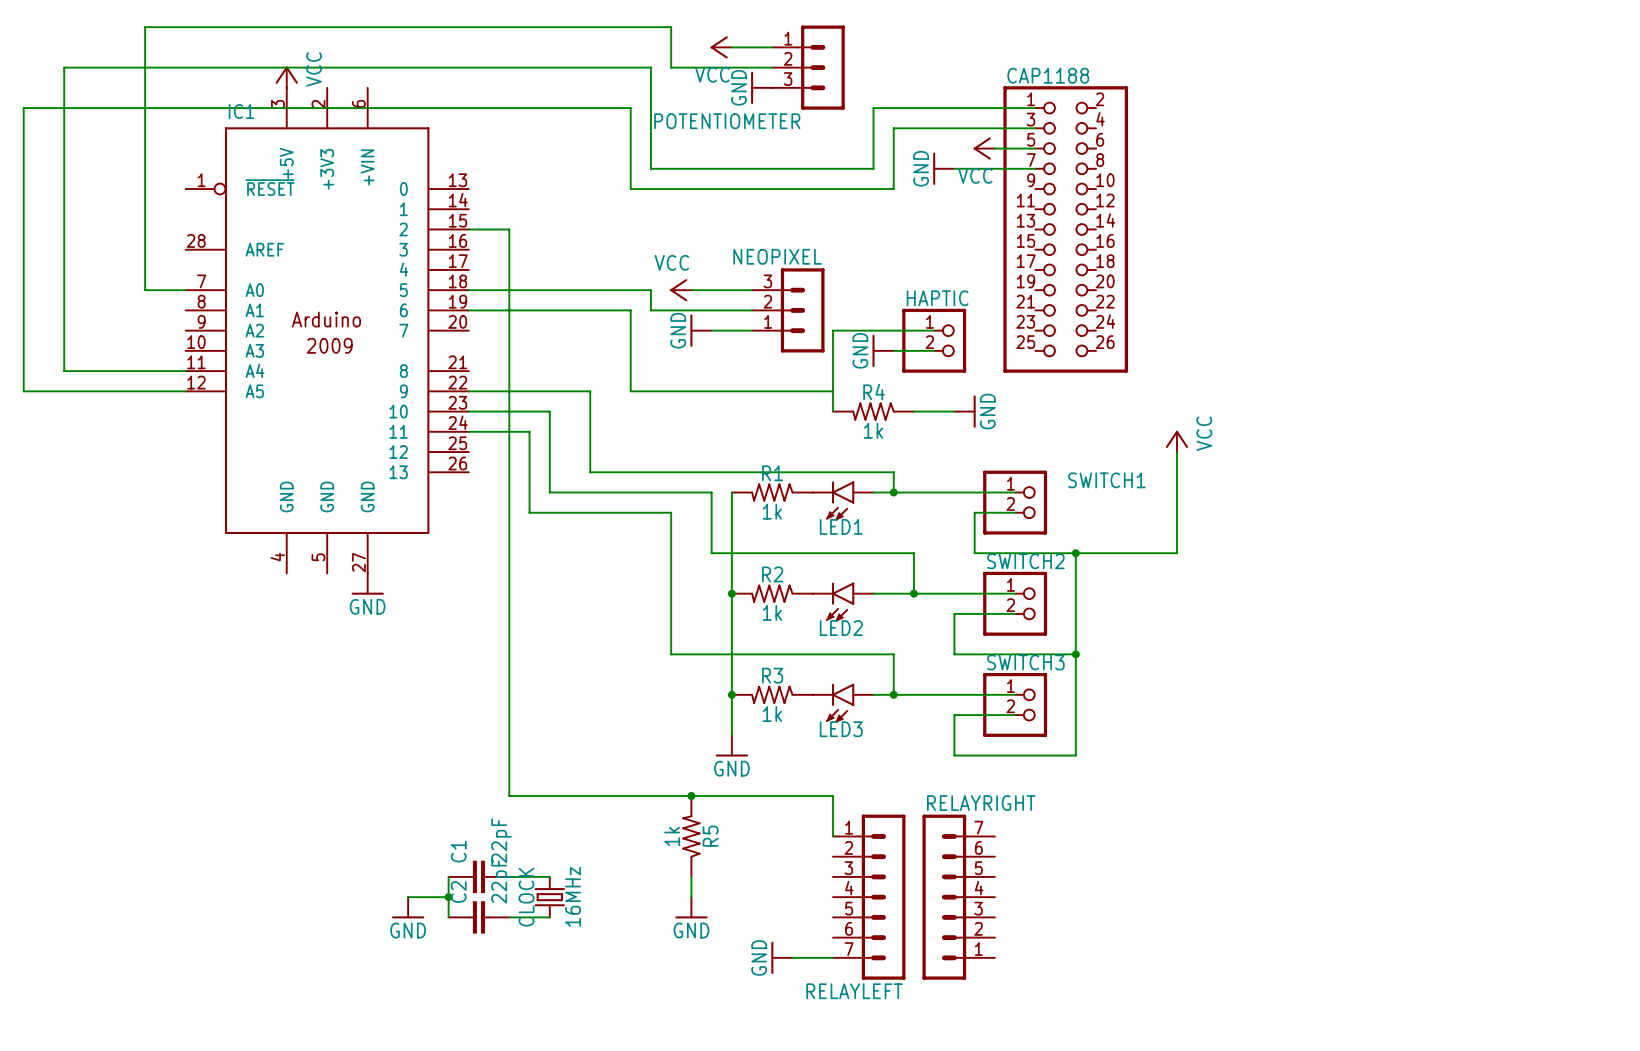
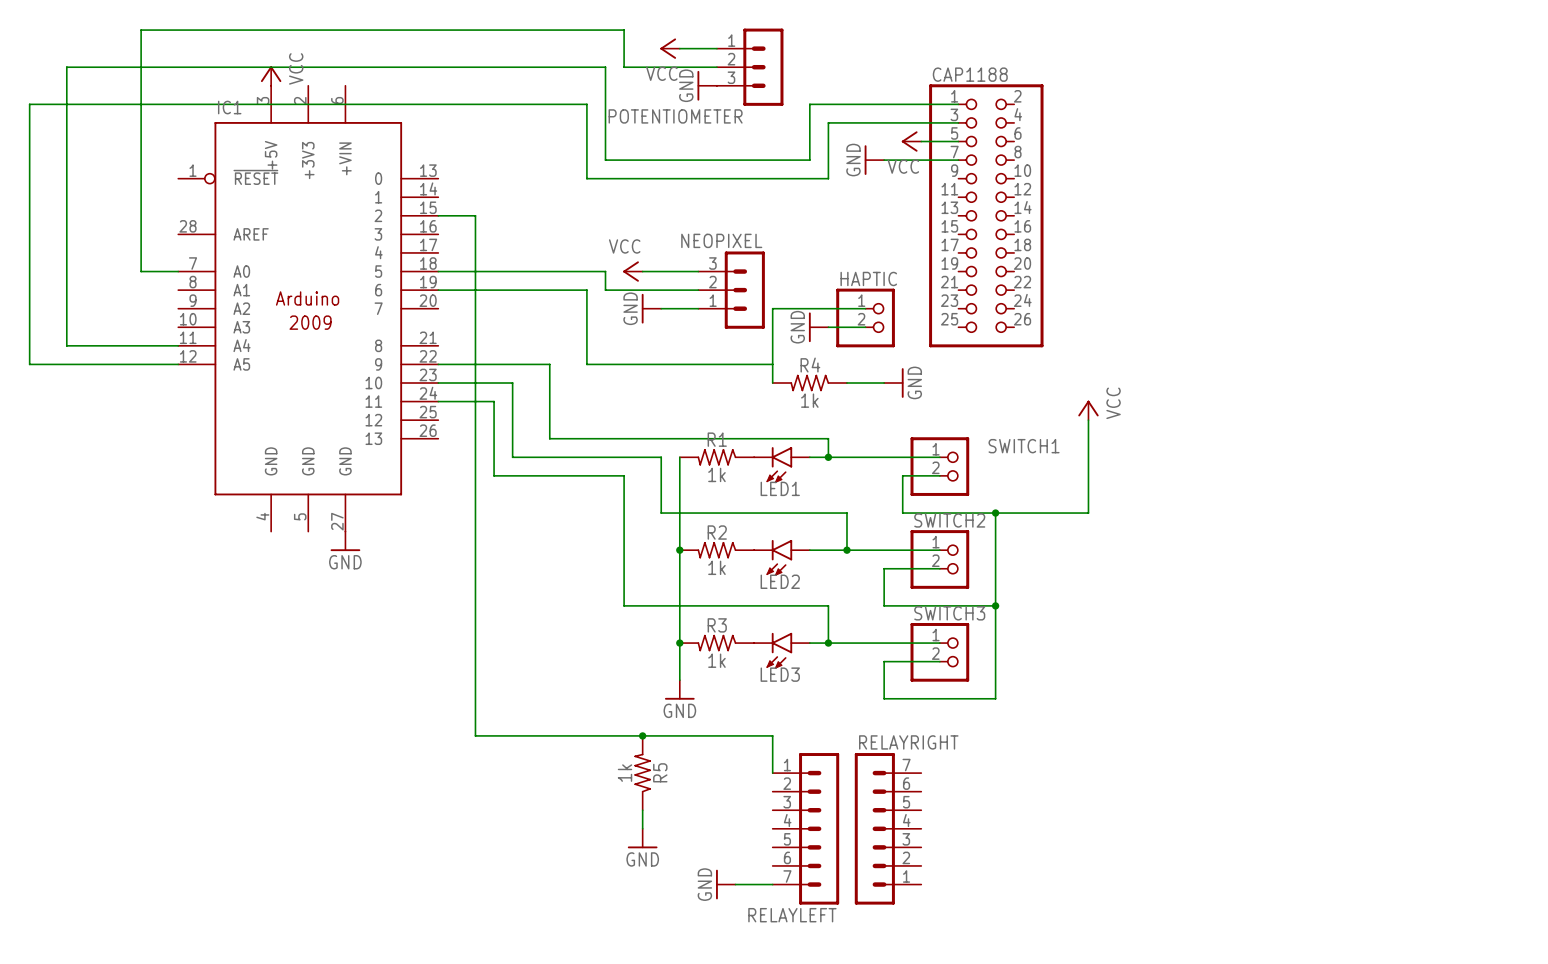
wire: (448, 876) (448, 917) -> none
C1: 22pF (478, 876) -> none
wire: (509, 876) (549, 876) -> none
wire: (408, 897) (448, 897) -> none
junction: (448, 897) -> none
CLOCK: 16MHz (549, 897) -> none
power symbol: GND (408, 907) -> none
C2: 22pF (478, 917) -> none
wire: (509, 917) (549, 917) -> none

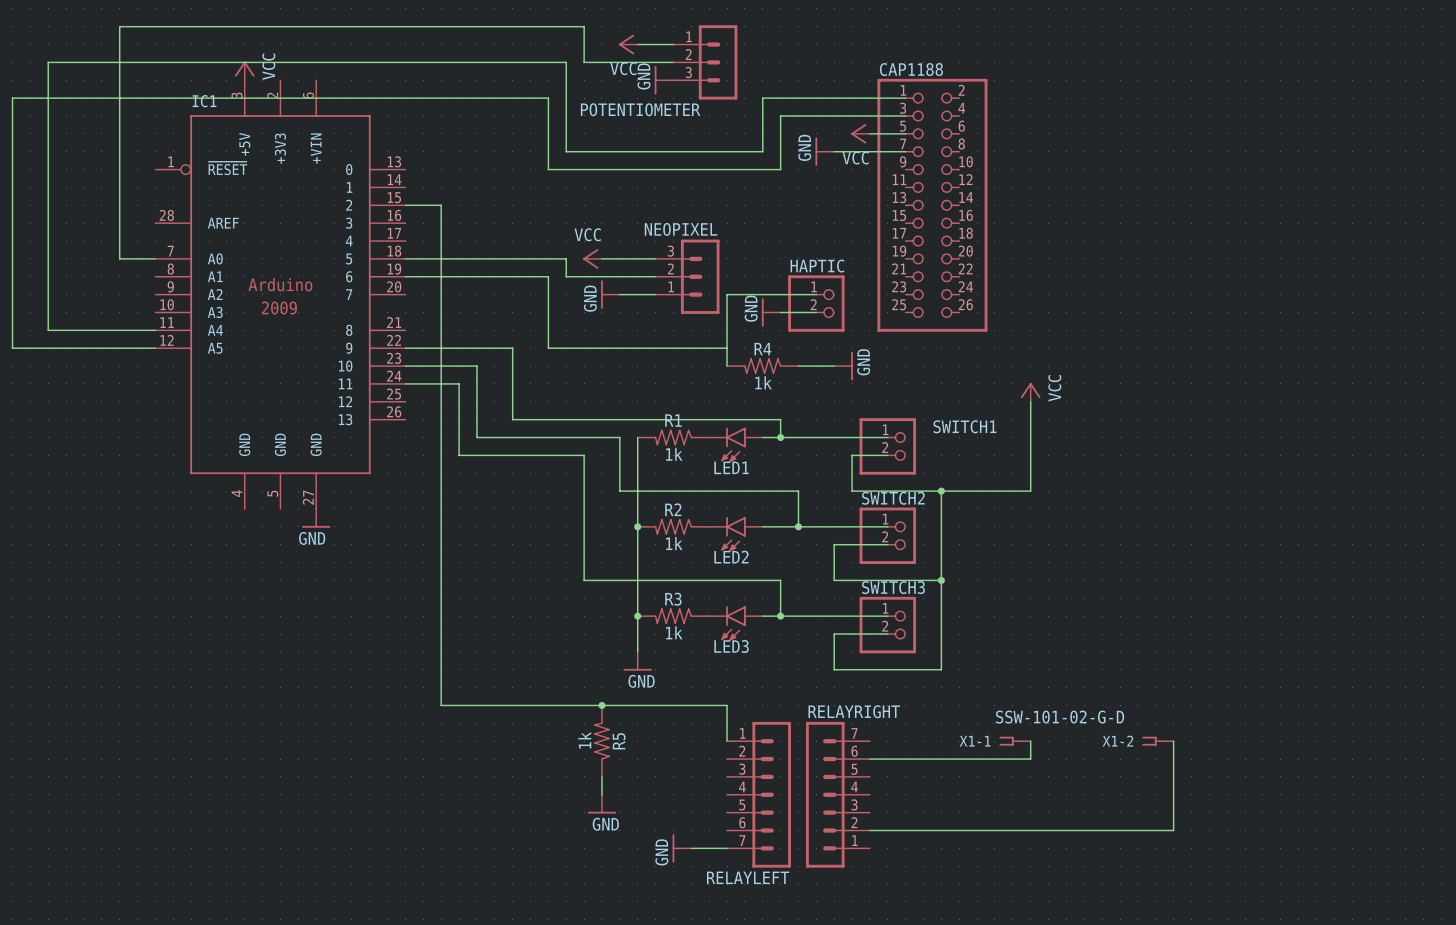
X1-1: none -> SSW-101-02-G-D (1015, 741)
wire: none -> (1030, 741) (1030, 759) (869, 759)
X1-2: none -> (1157, 741)
wire: none -> (1173, 741) (1173, 830) (869, 830)

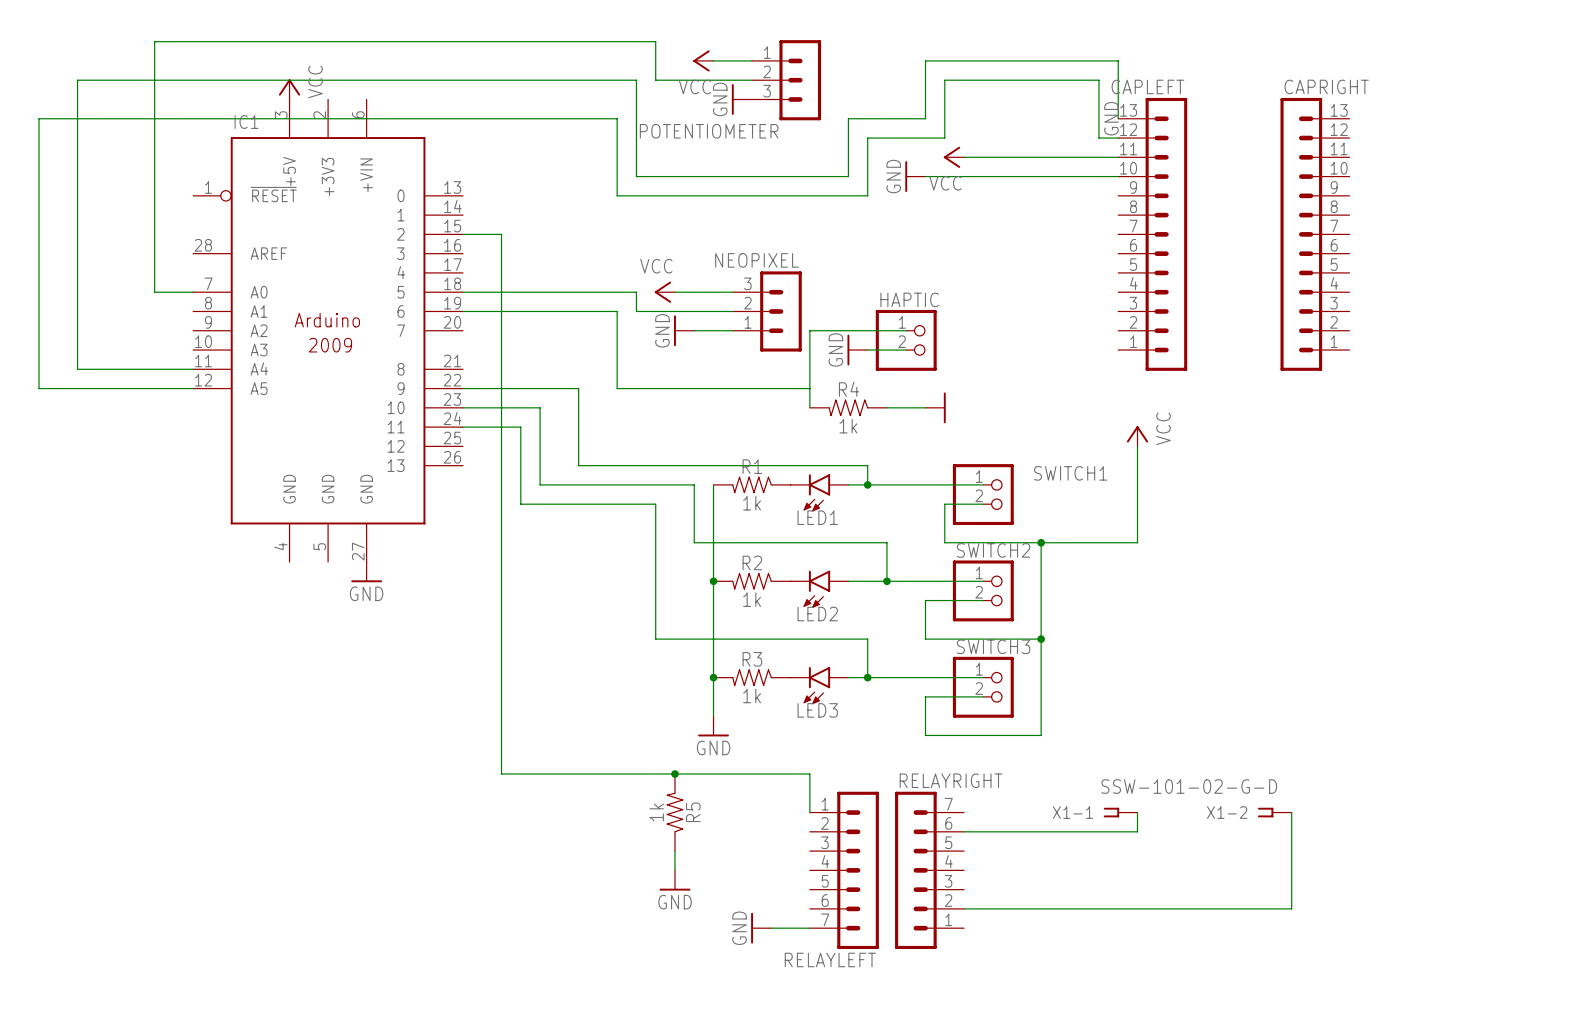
wire: (834, 98) (905, 98) -> (925, 118) (925, 60) (1118, 60) (1118, 118)
wire: (852, 115) (905, 115) -> (944, 138) (944, 80) (1098, 80) (1098, 138) (1118, 138)
wire: none -> (1002, 157) (1118, 157)
wire: none -> (1002, 176) (1118, 176)
CAP1188: (932, 205) -> none
CAPLEFT: none -> (1152, 234)
CAPRIGHT: none -> (1315, 234)
power symbol text position: GND (863, 362) -> GND (1111, 118)

